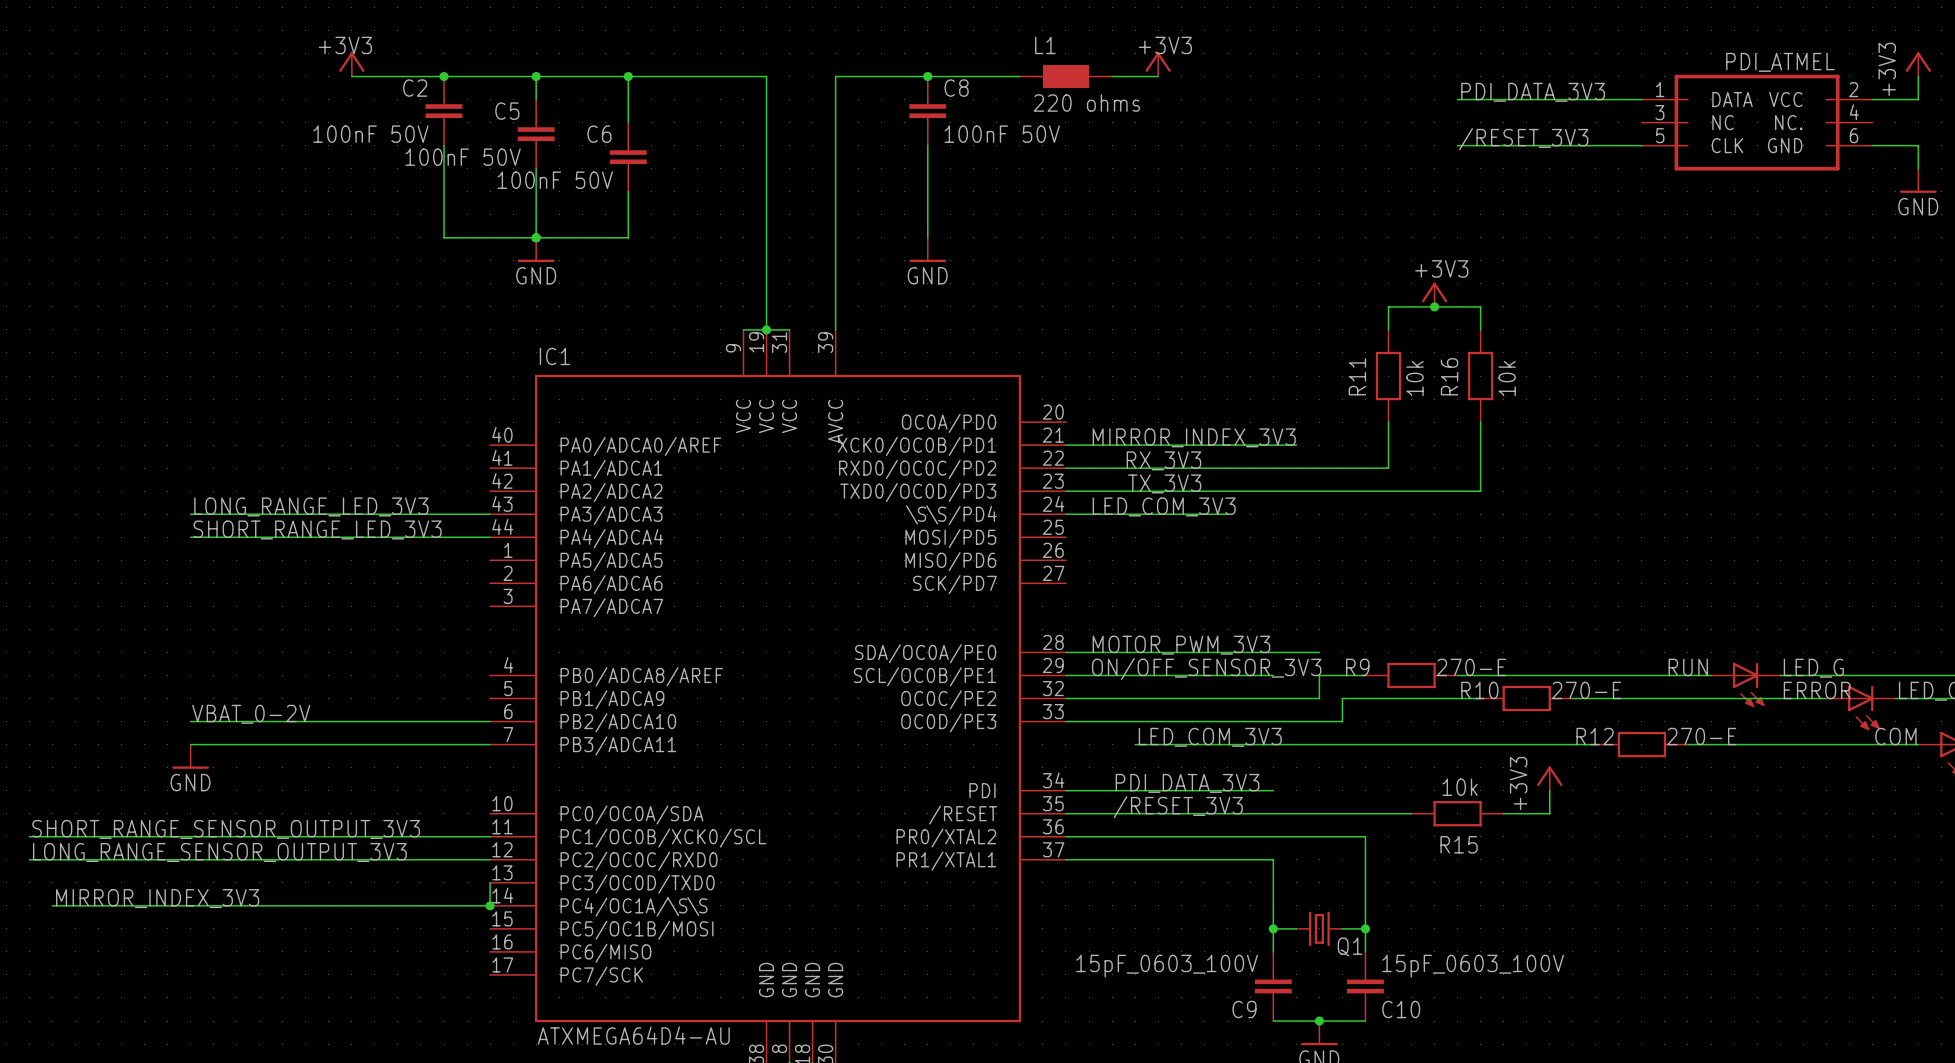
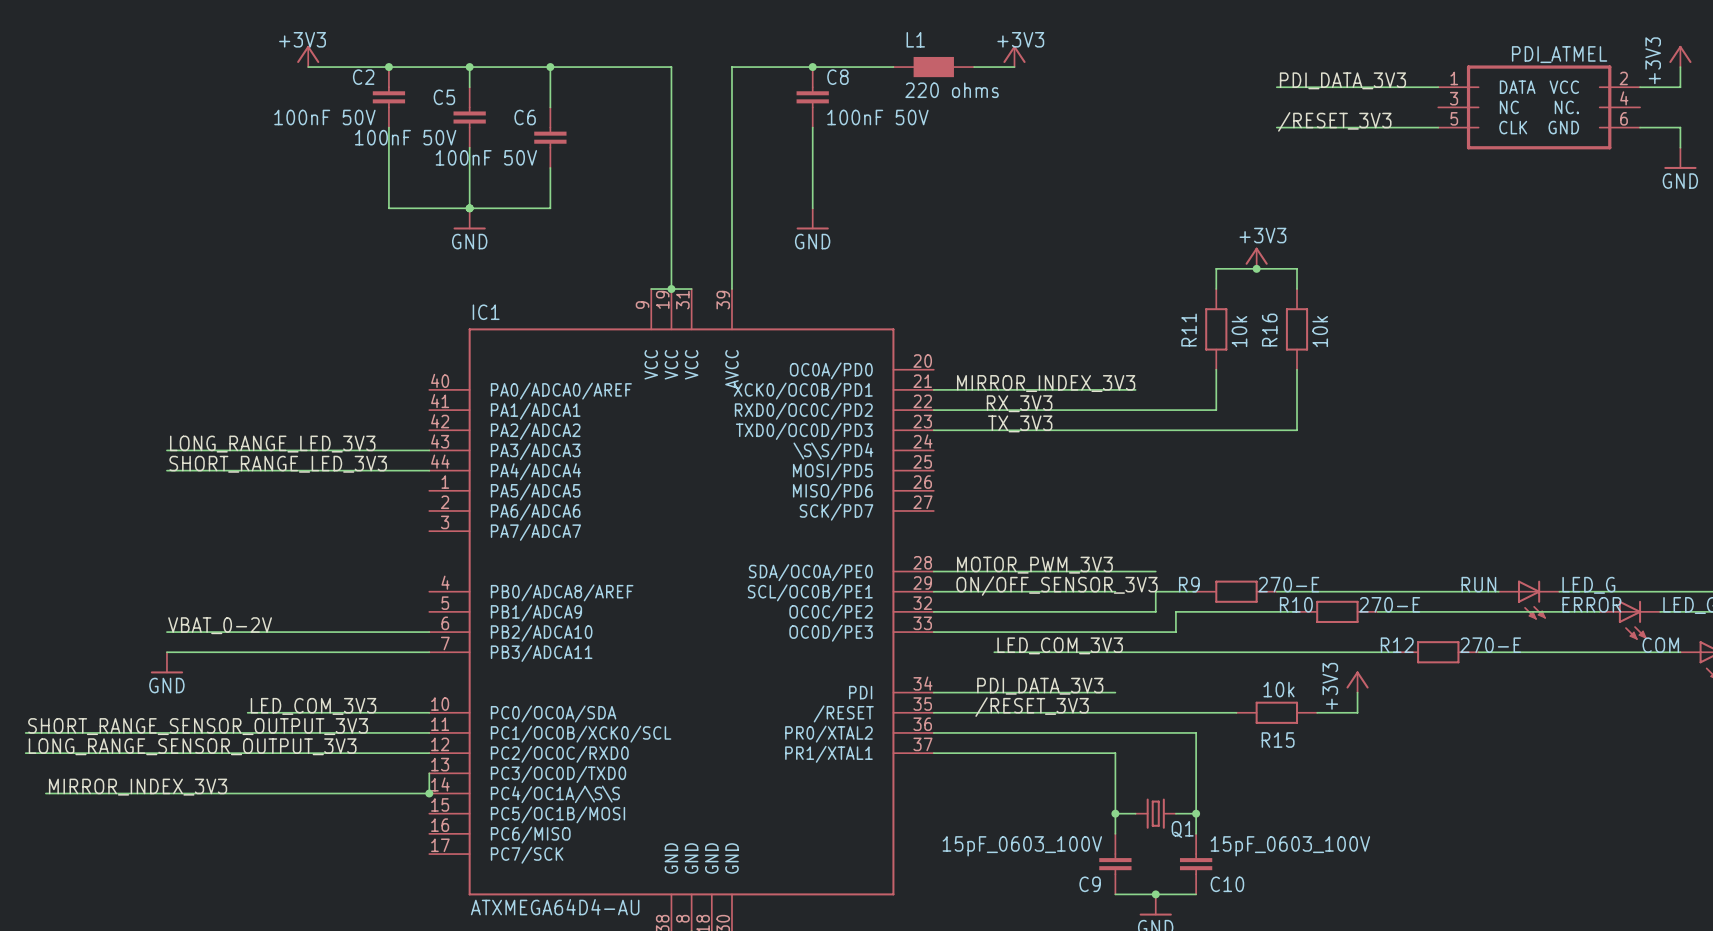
label: LED_COM_3V3 (1164, 506) -> none
wire: (1065, 514) (1227, 514) -> none
label: none -> LED_COM_3V3 (313, 706)
wire: none -> (247, 712) (429, 712)

